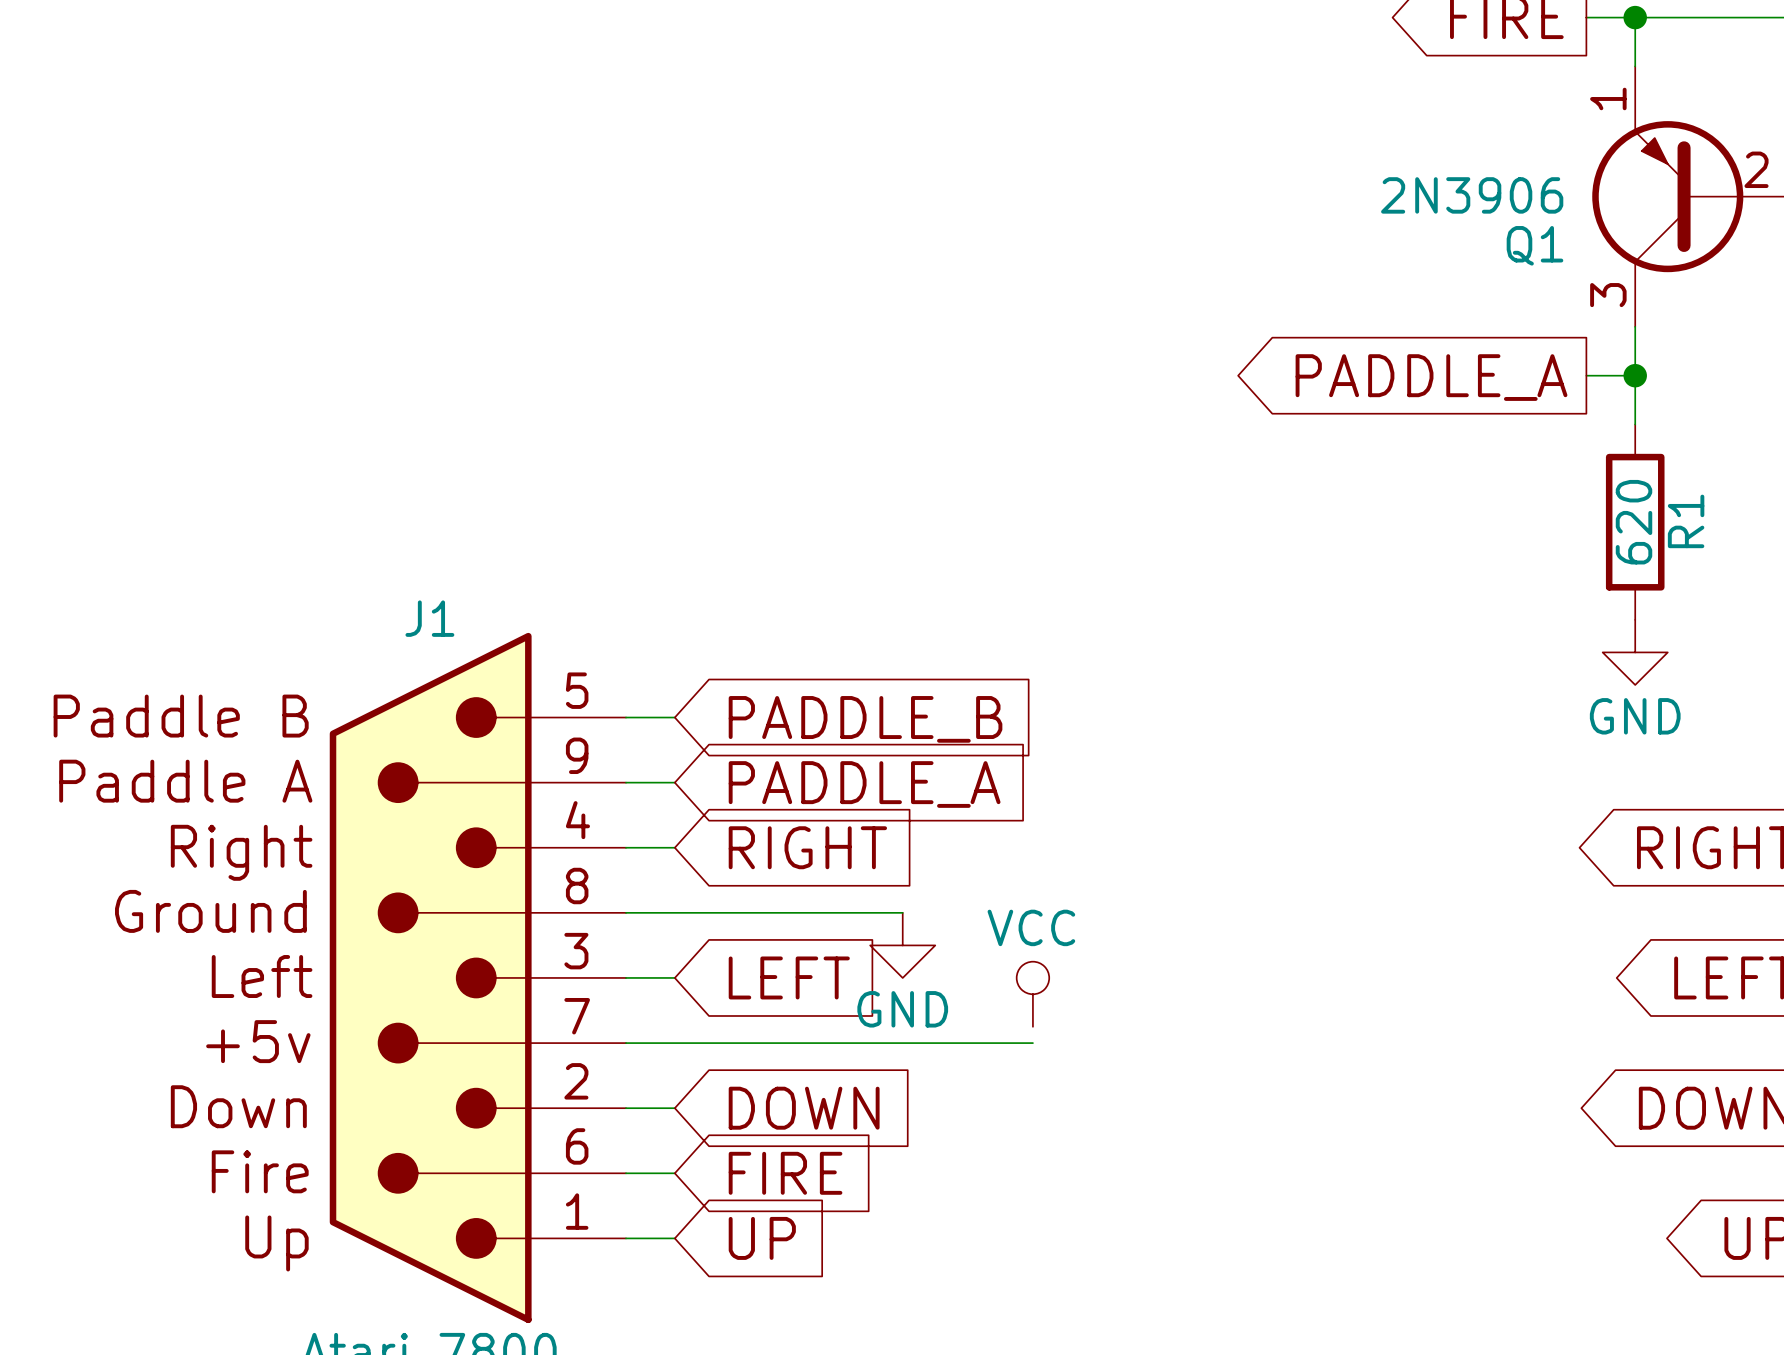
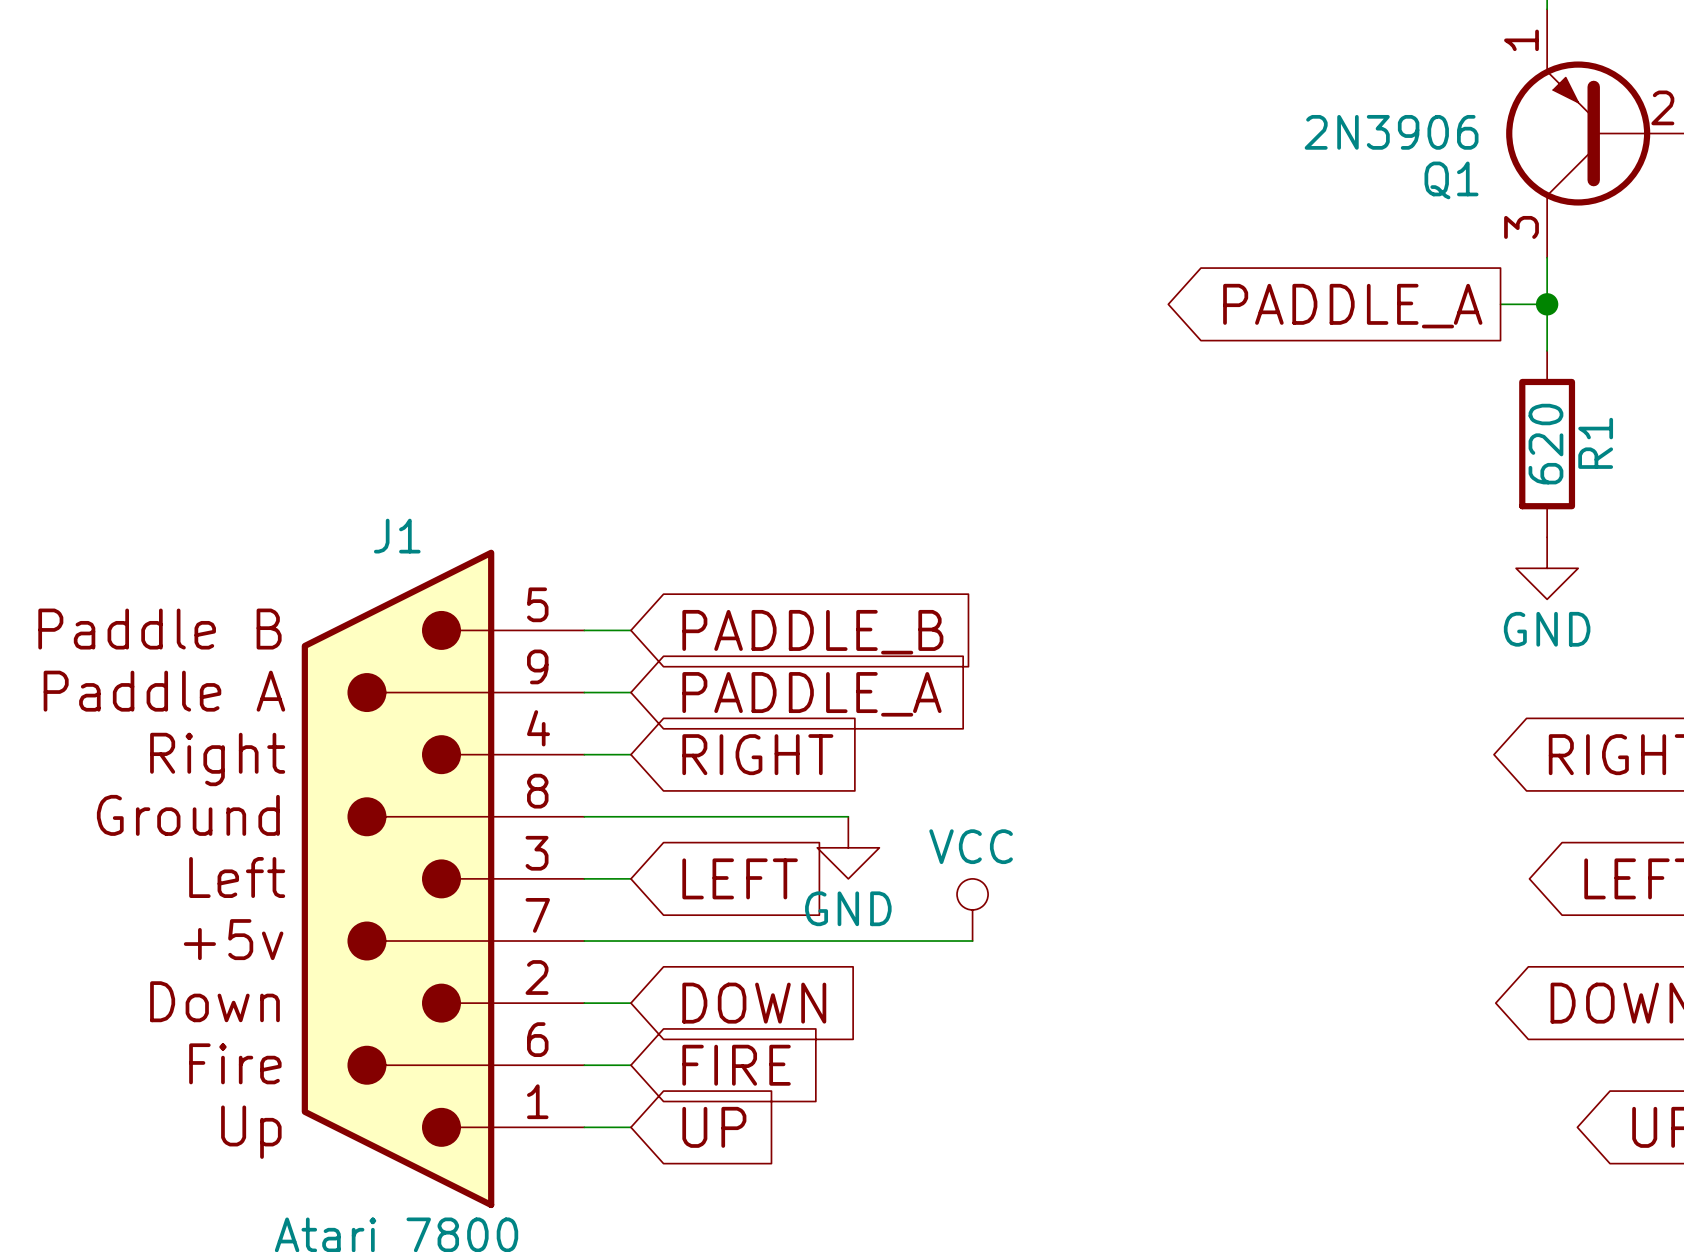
power symbol position: VCC (1032, 994) -> VCC (972, 909)

